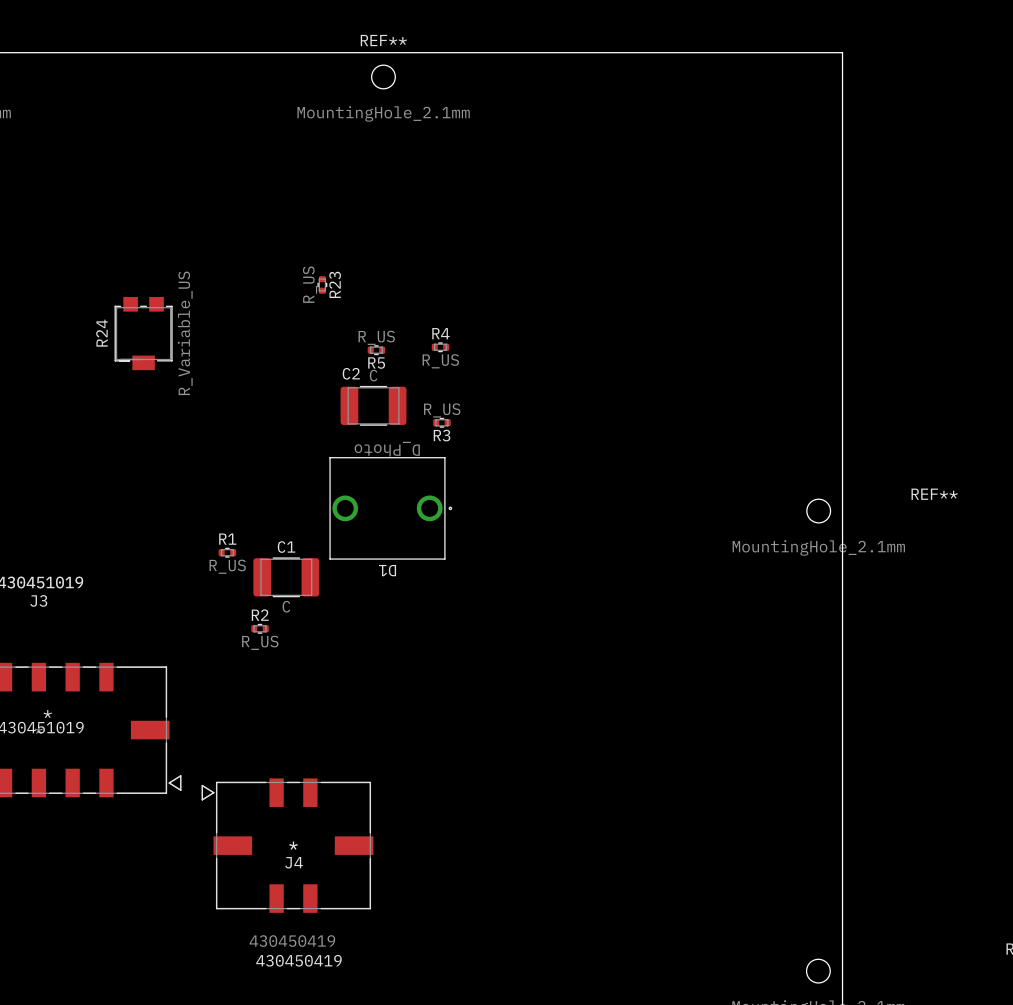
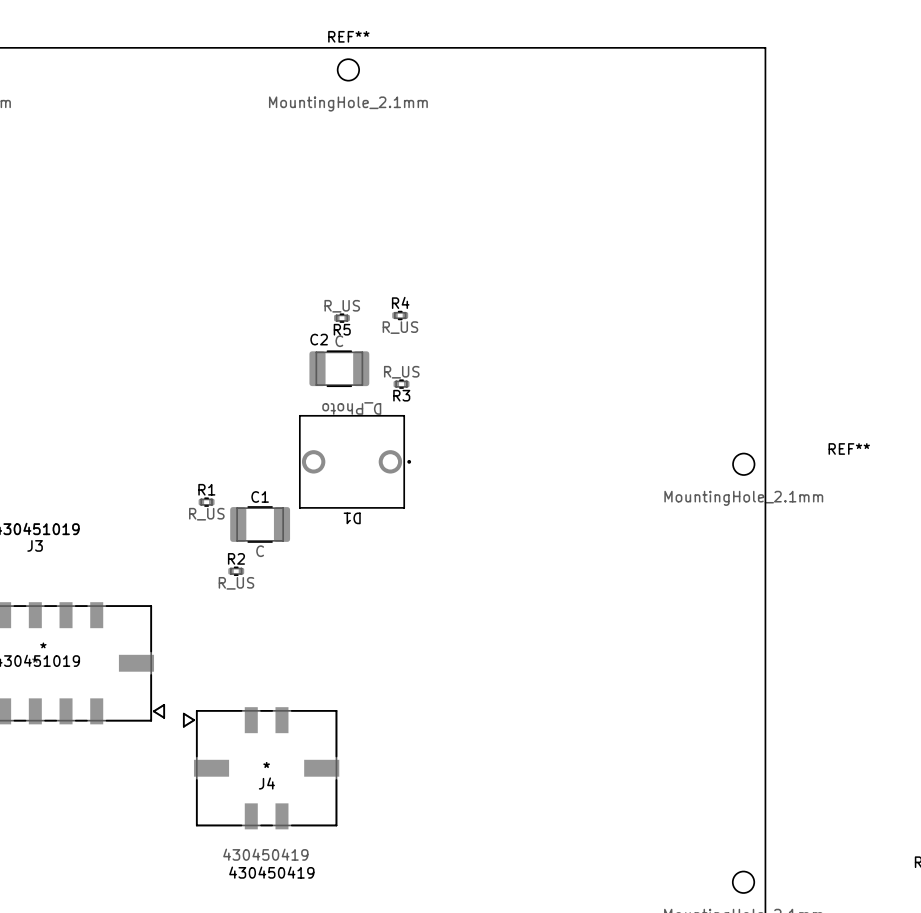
R23: R_US (322, 284) -> none
R24: R_Variable_US (143, 333) -> none

